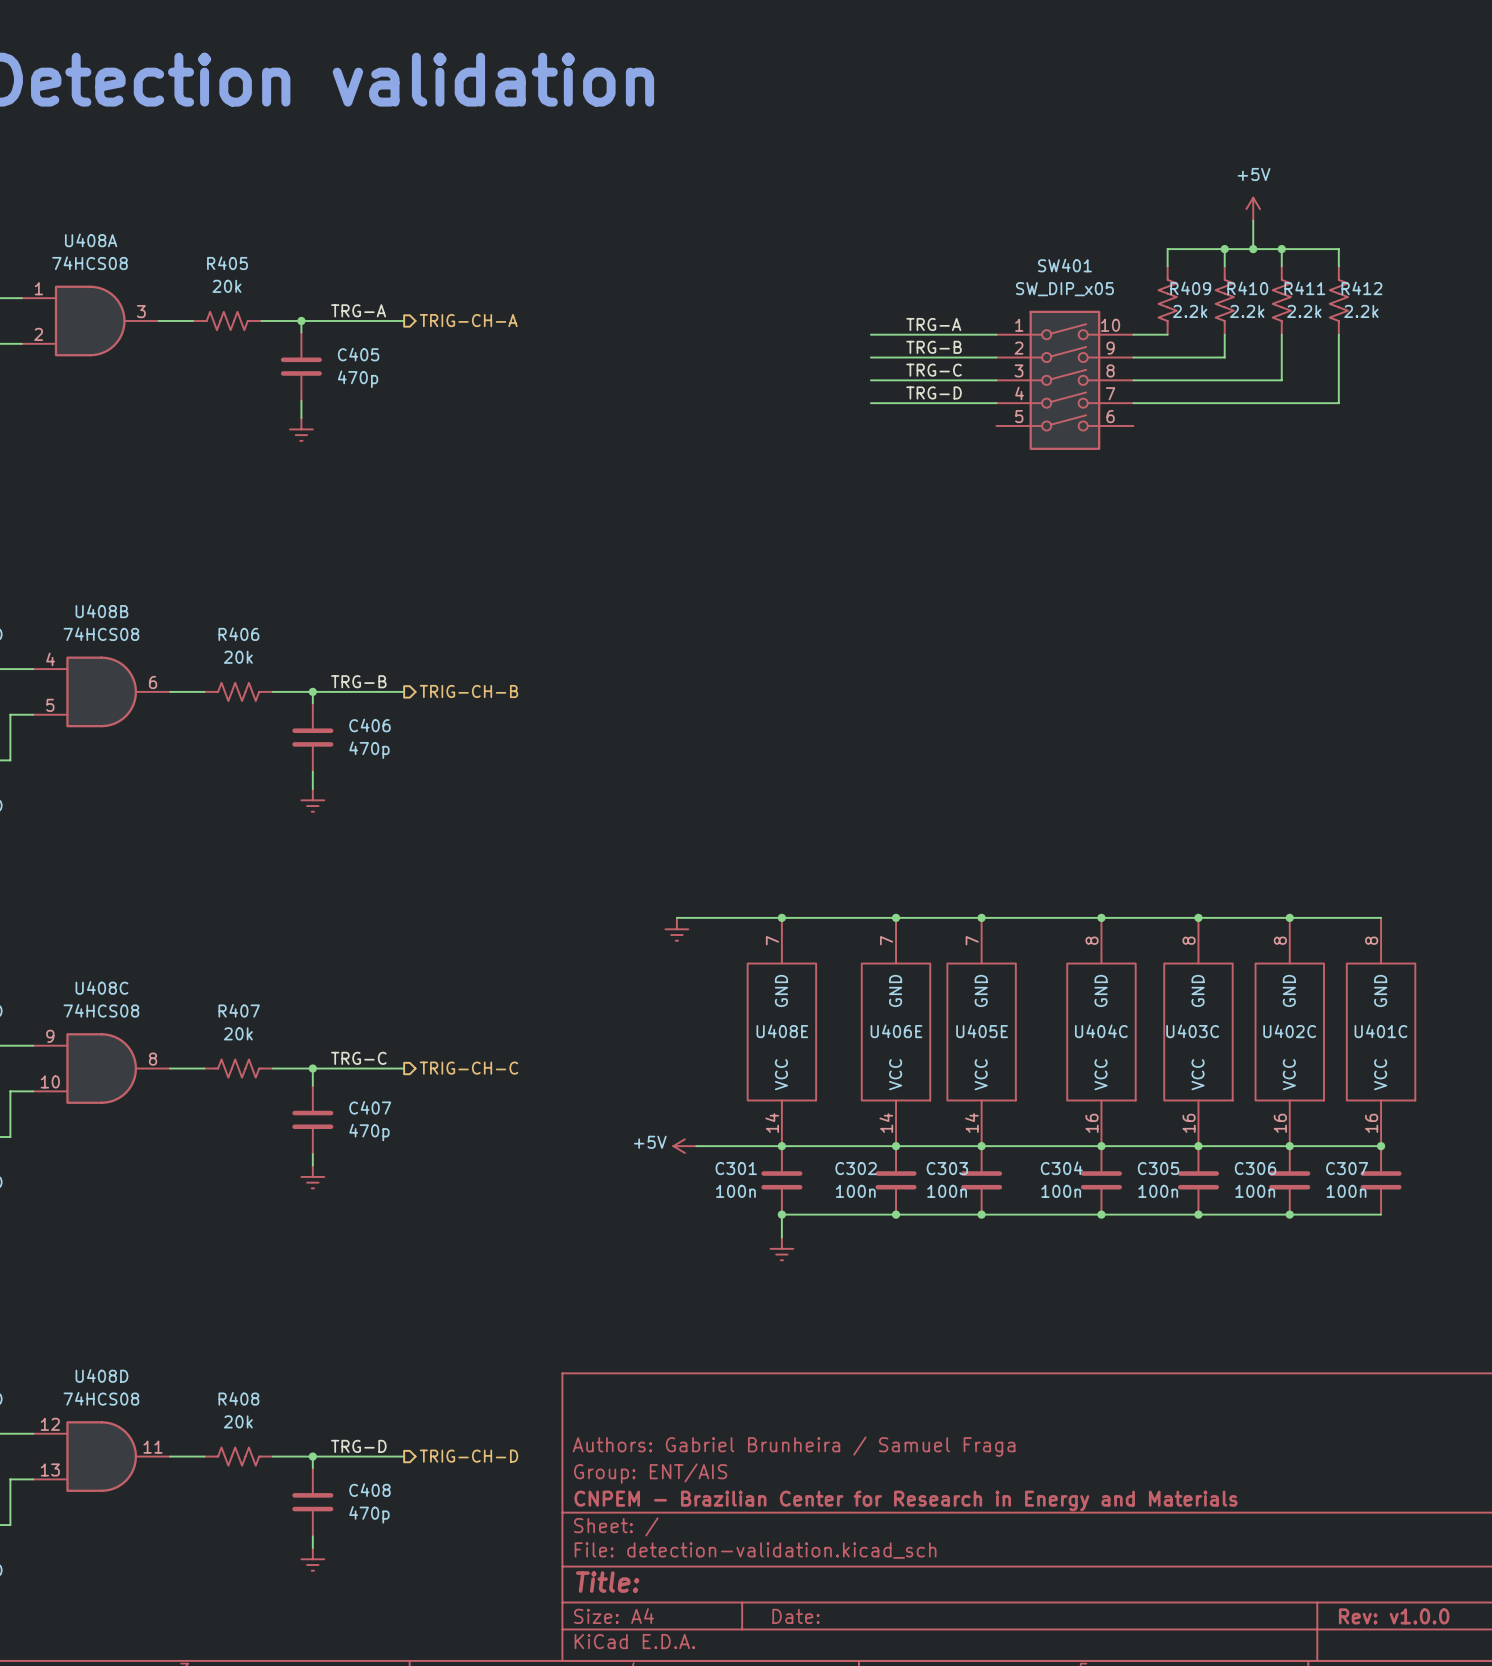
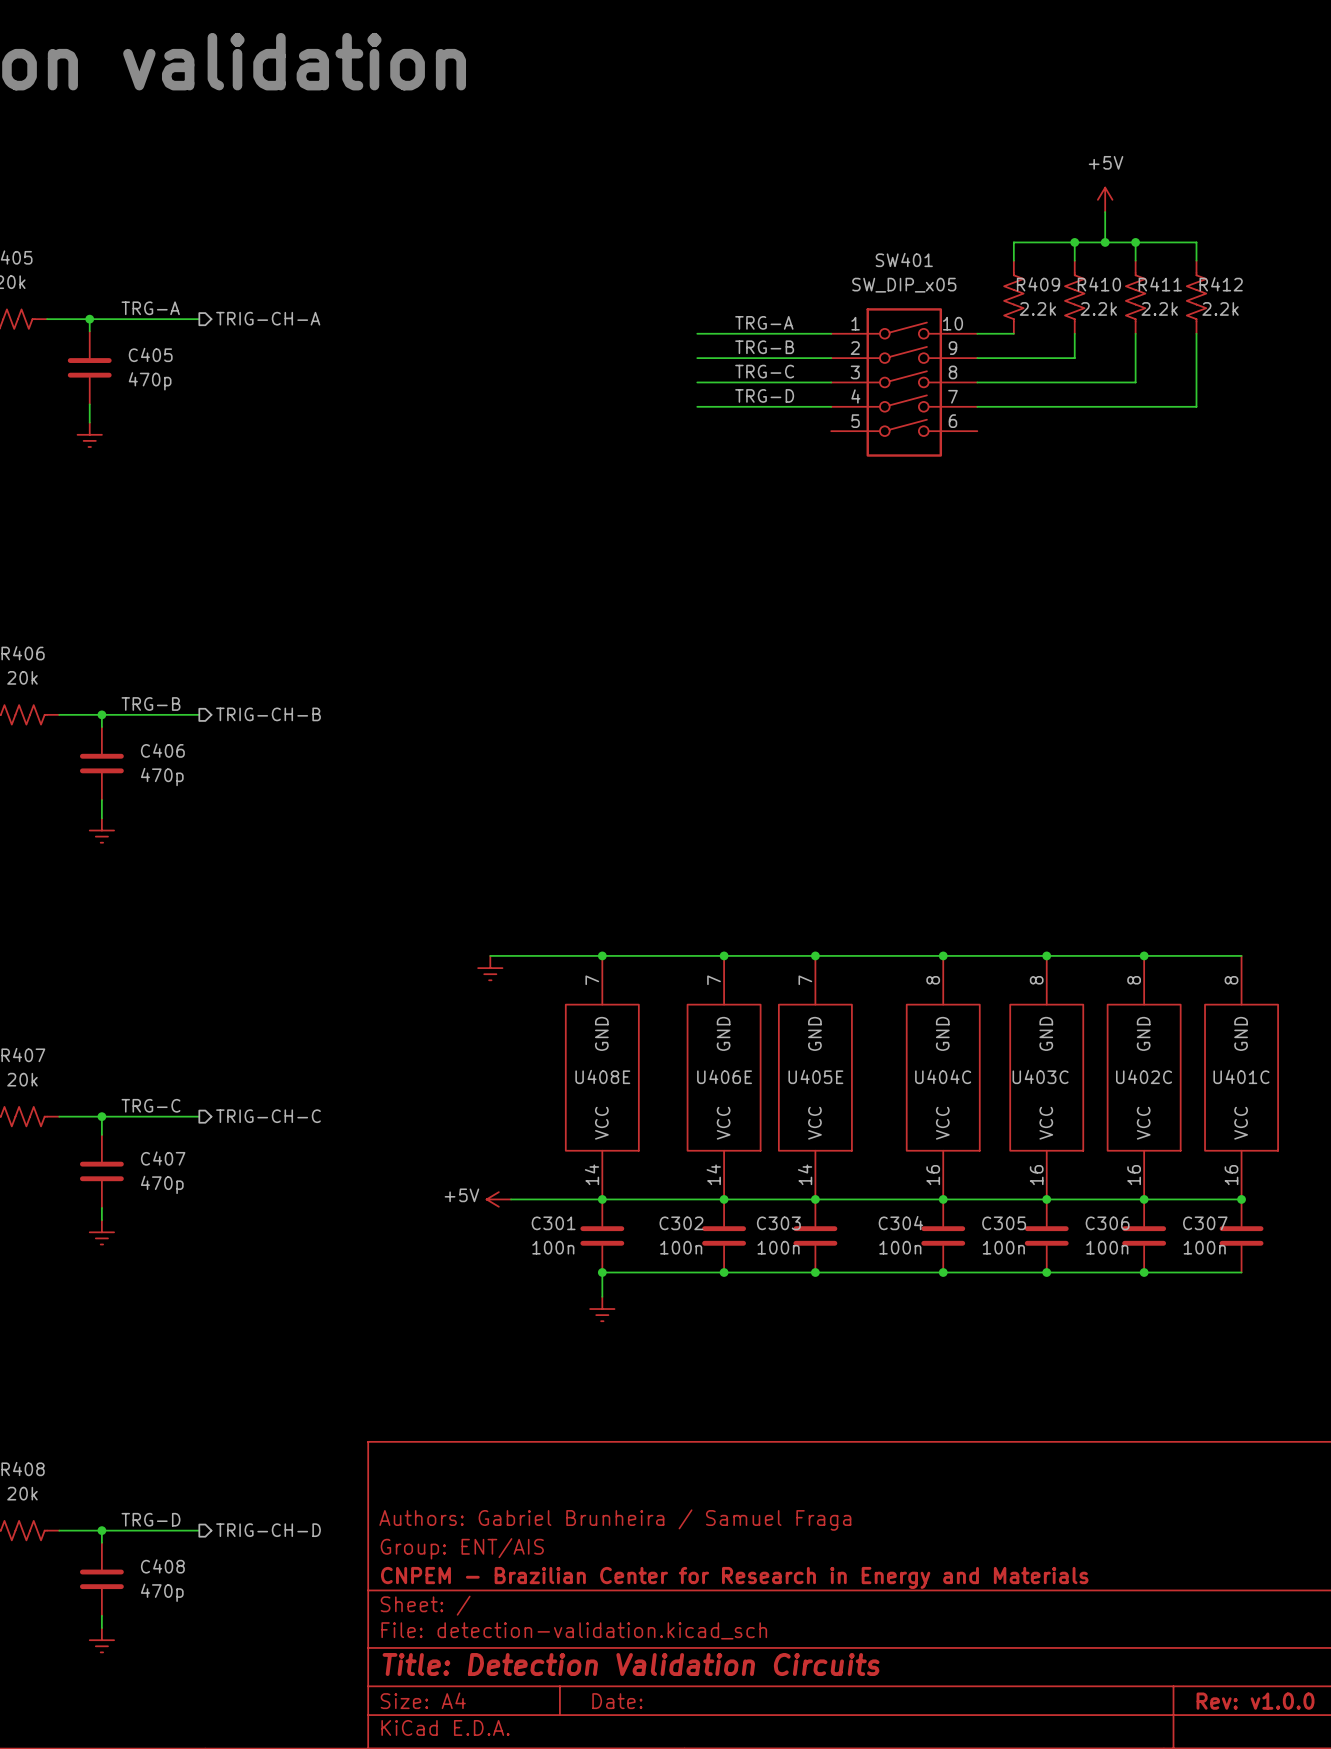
title block: Title: (607, 1582) -> Title: Detection Validation Circuits (631, 1664)

